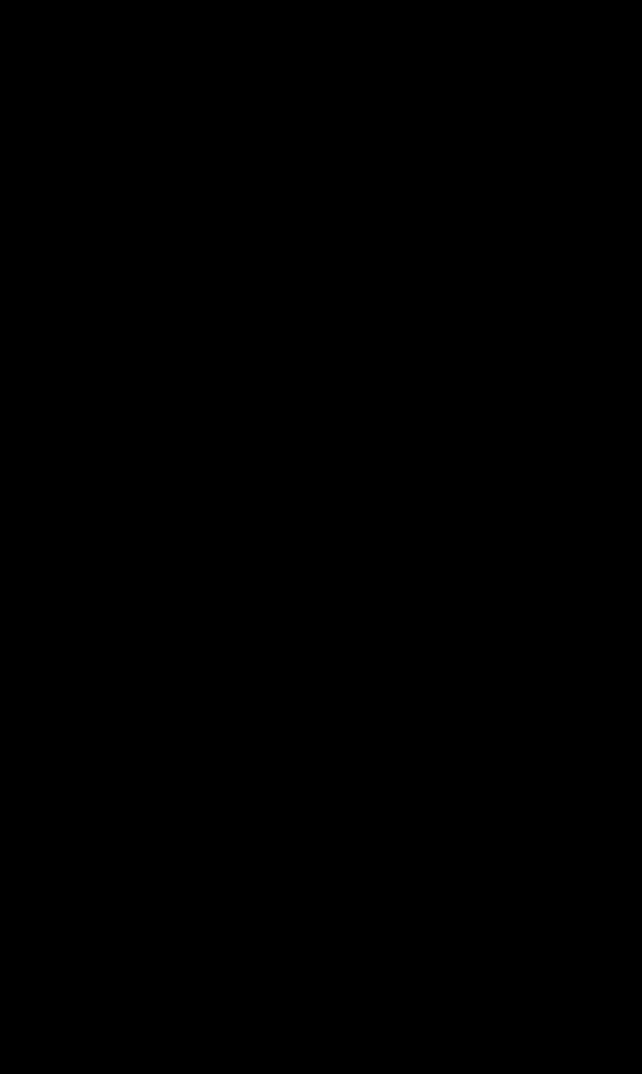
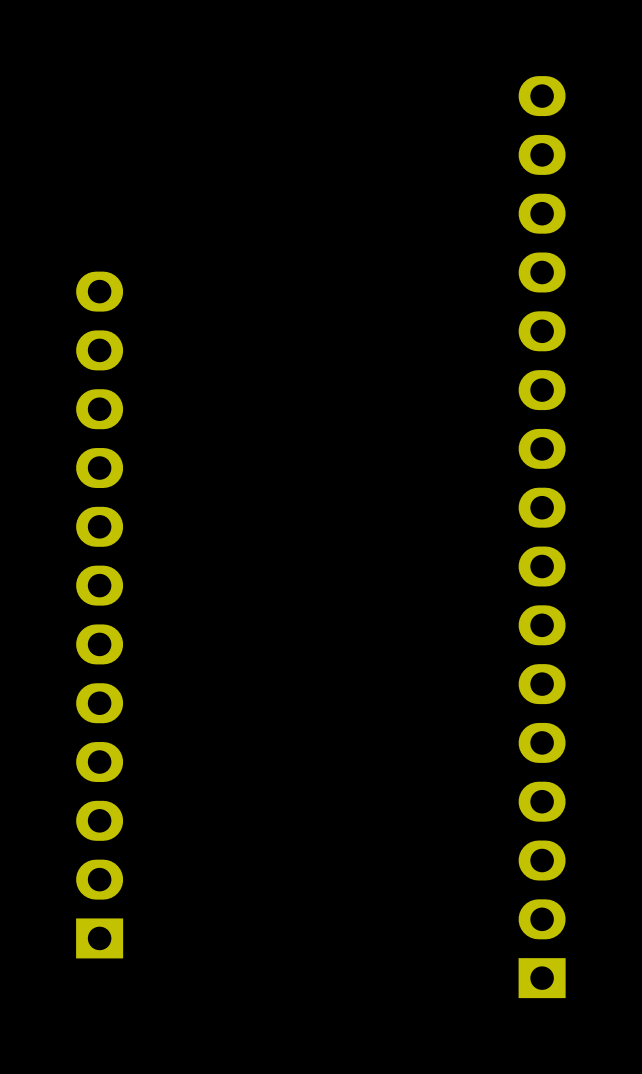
part: none -> (542, 537)
part: none -> (99, 615)

